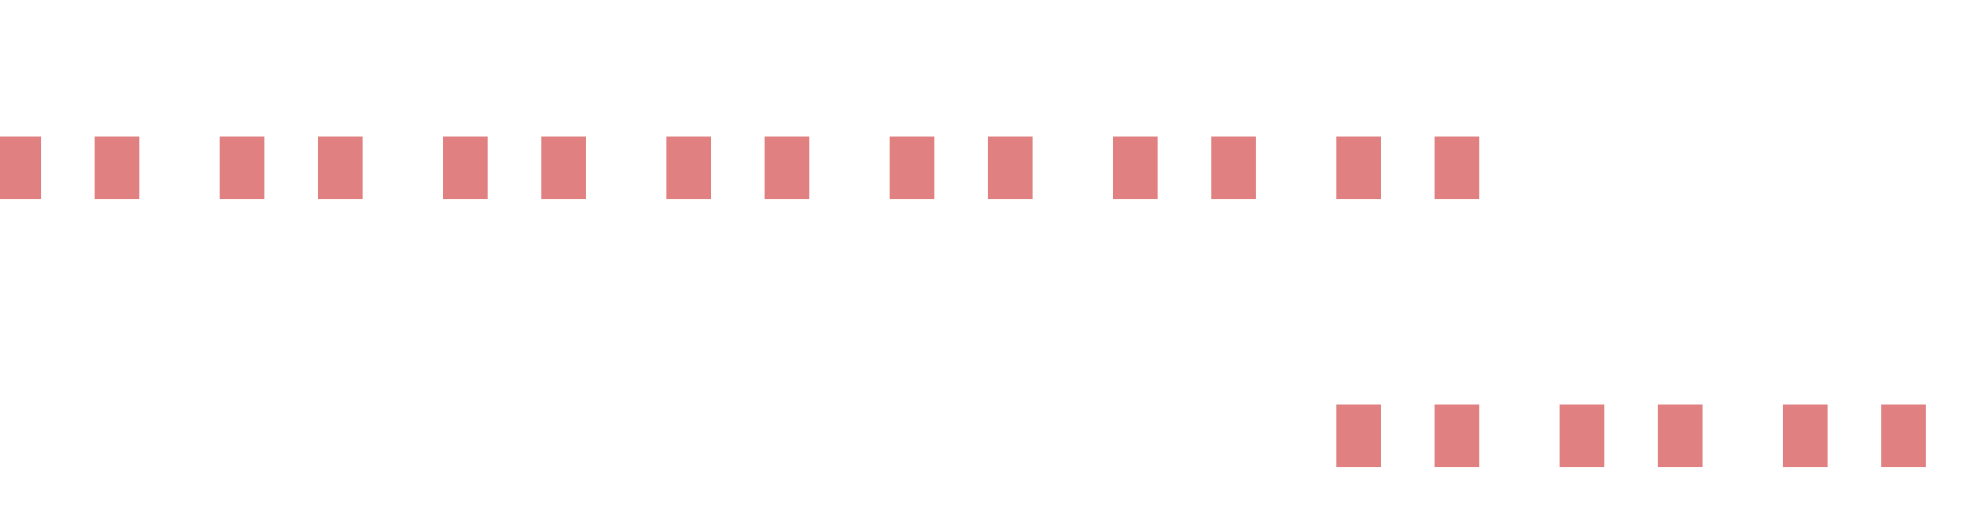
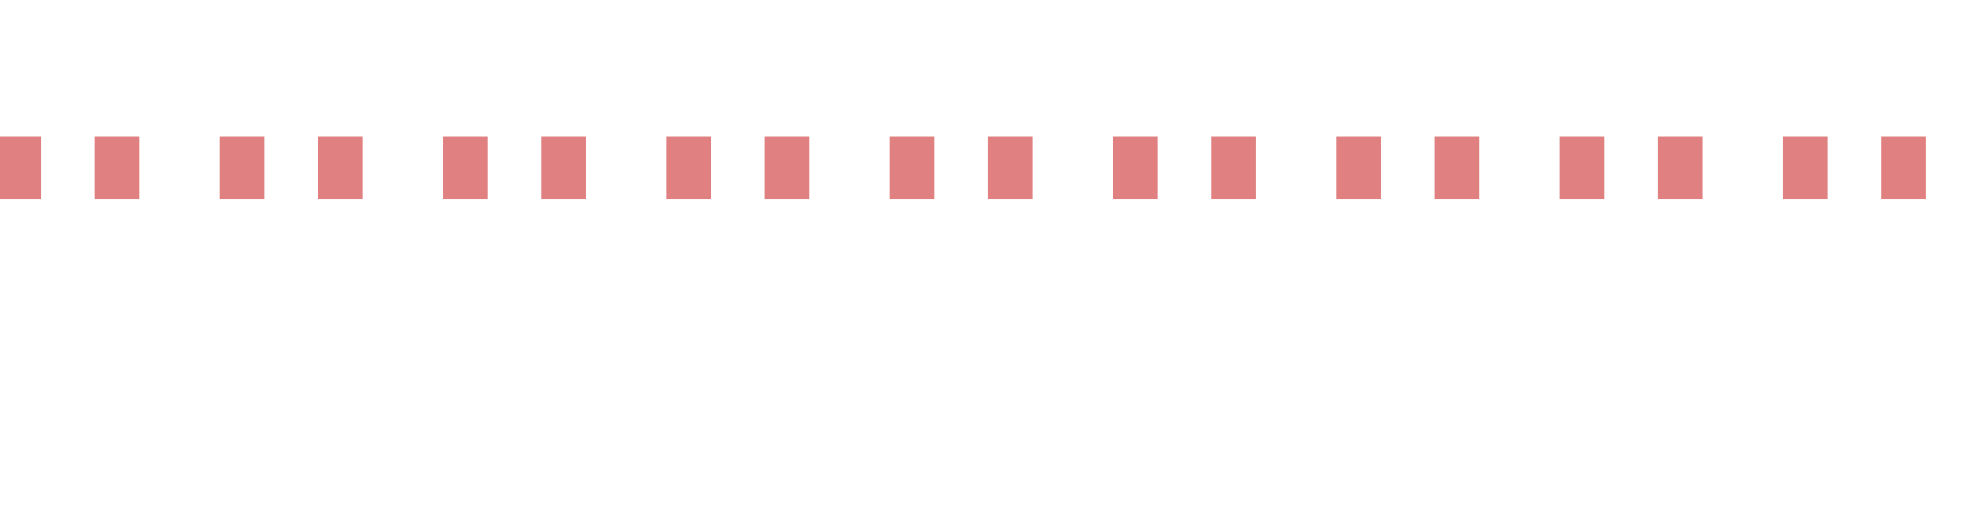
part: none -> (1631, 167)
part: none -> (1854, 167)
part: (1407, 435) -> none
part: (1631, 435) -> none
part: (1854, 435) -> none

